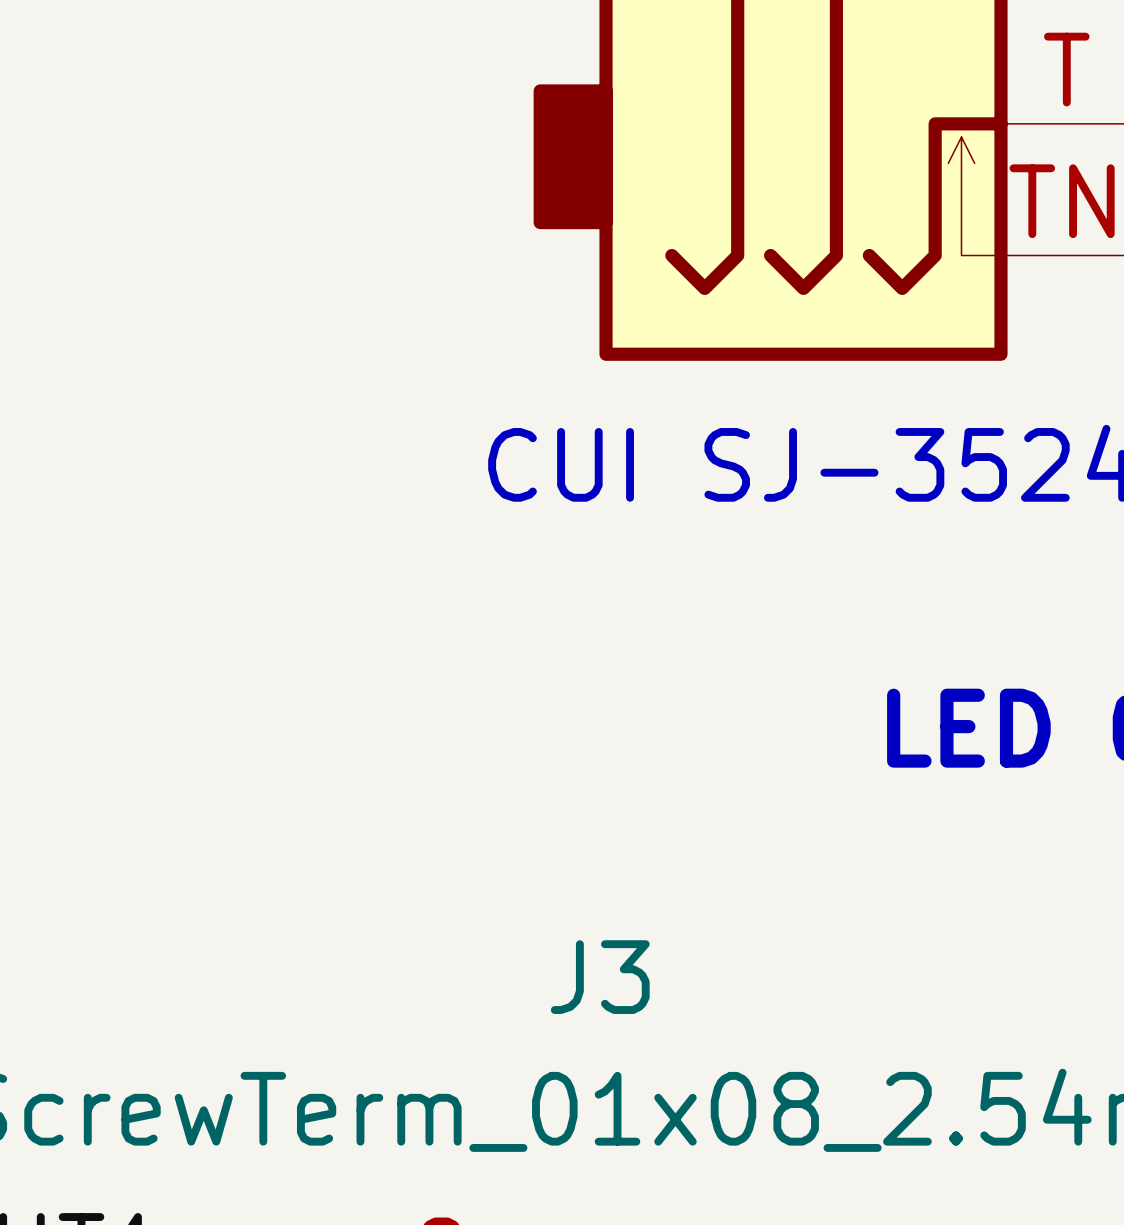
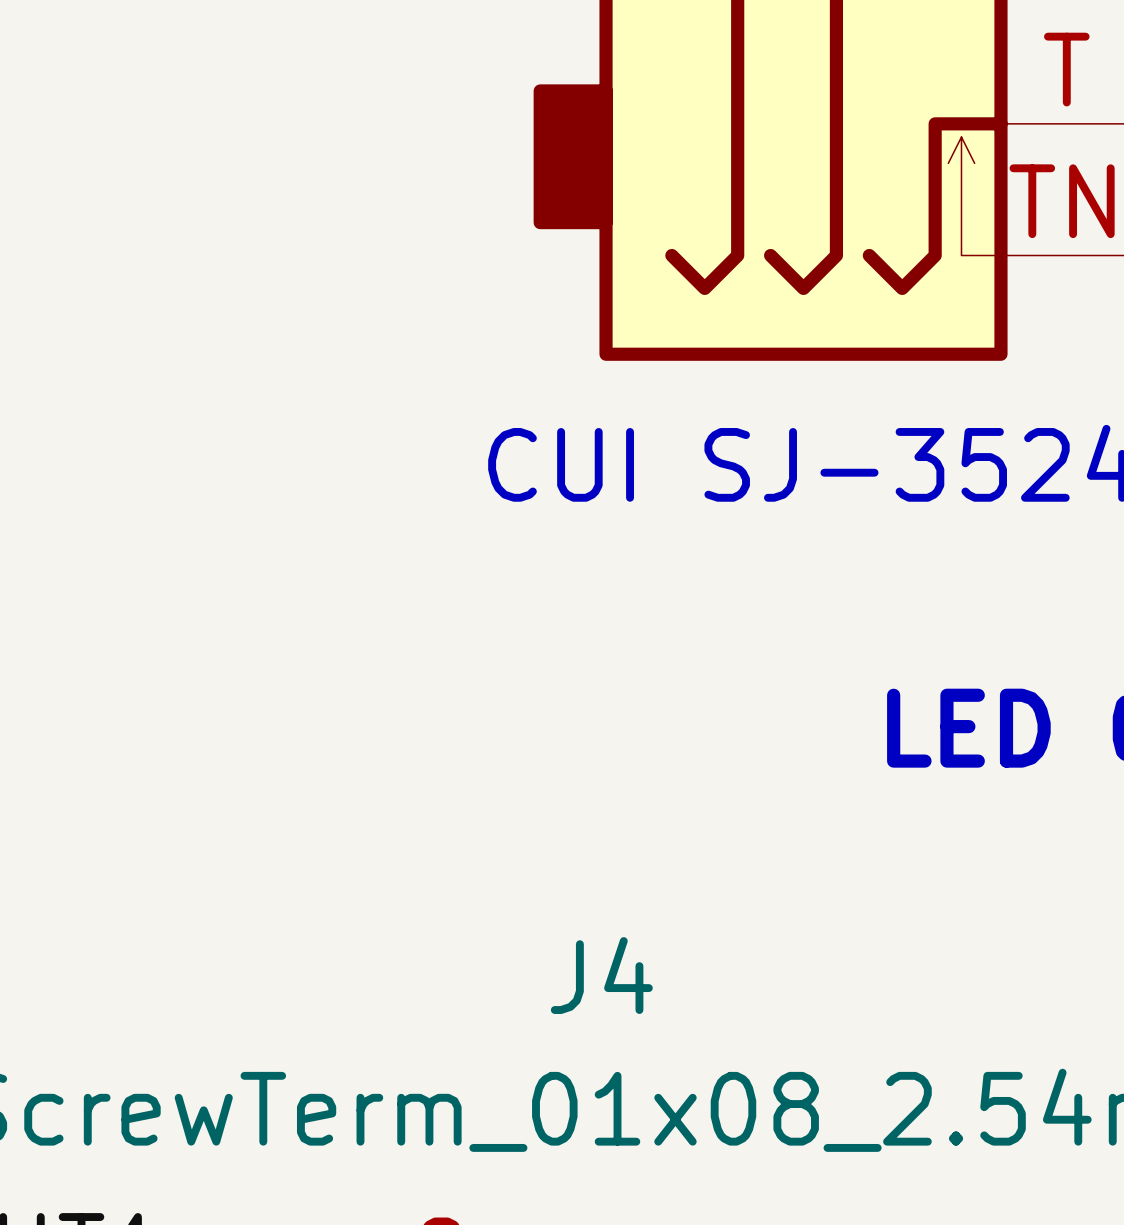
J3 name: J3 (600, 977) -> J4 (601, 975)

